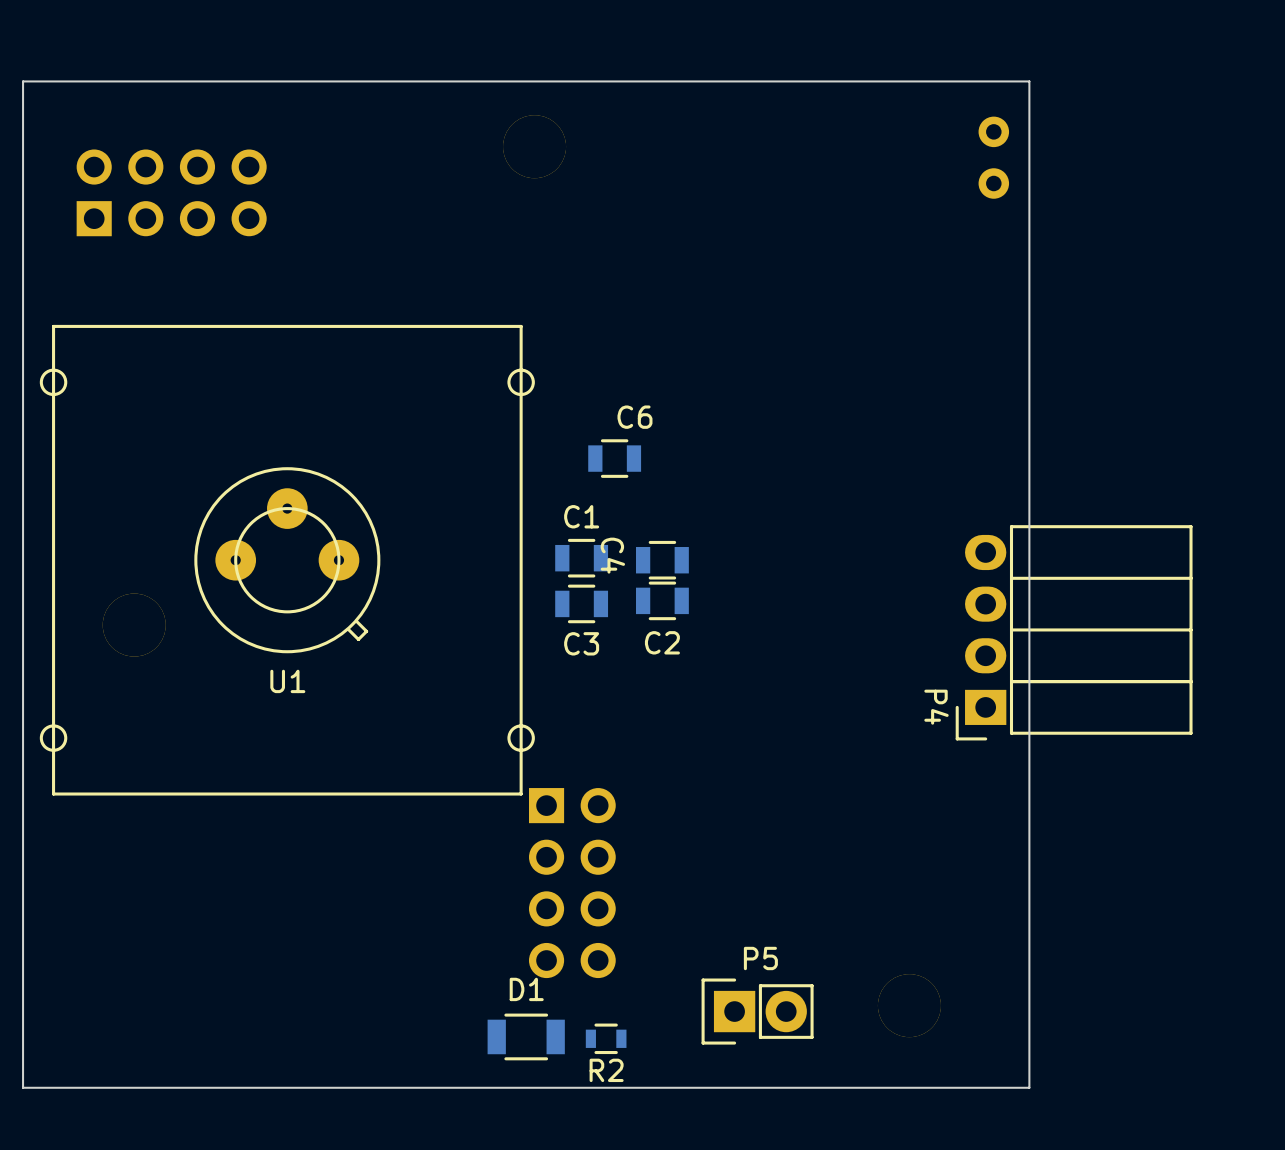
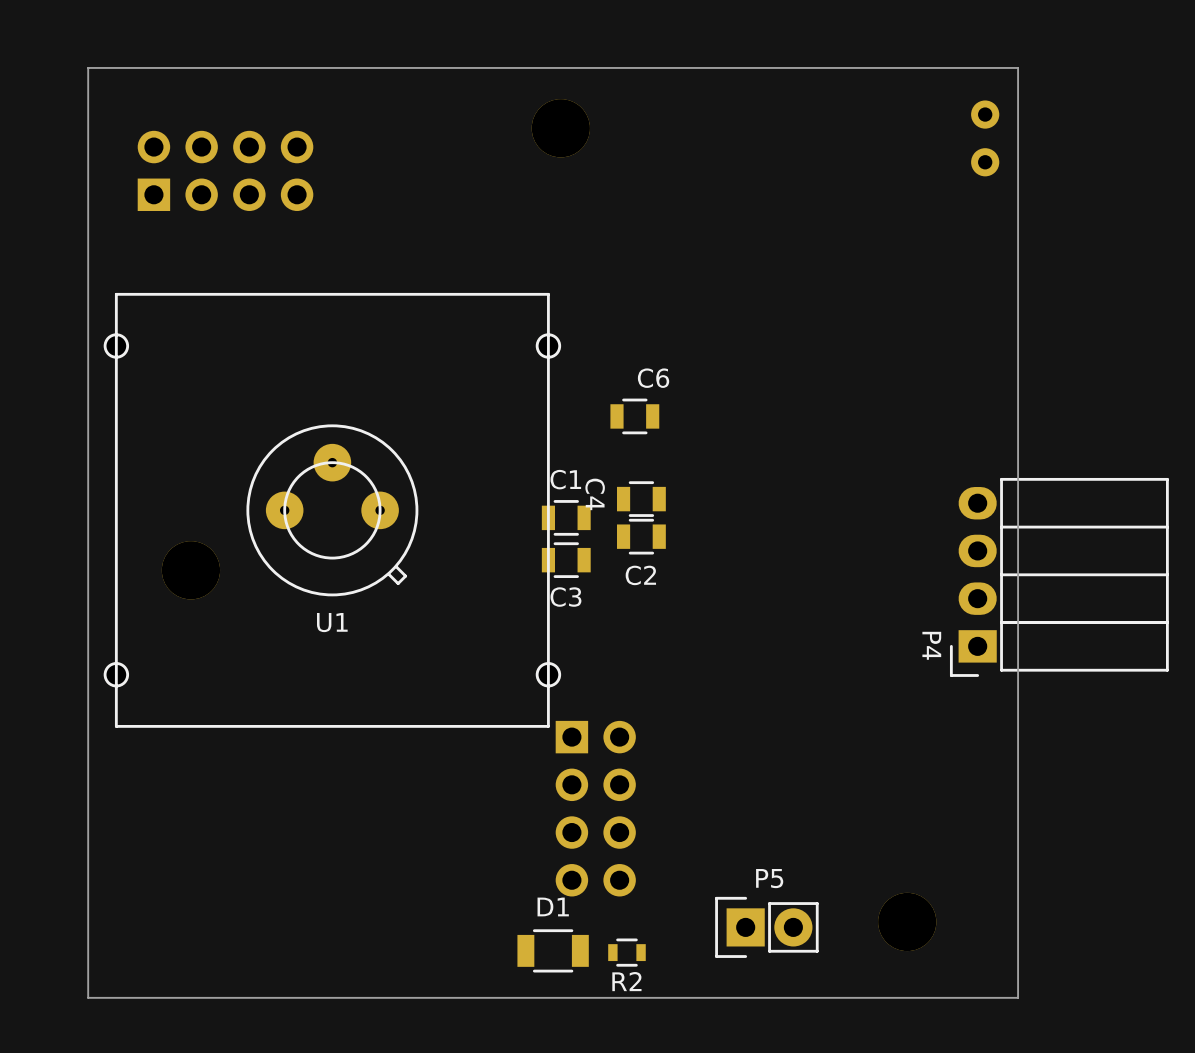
C1 position: (581, 558) -> (566, 517)
C4 position: (662, 560) -> (641, 499)
C2 position: (662, 600) -> (641, 536)
C3 position: (581, 603) -> (566, 560)

